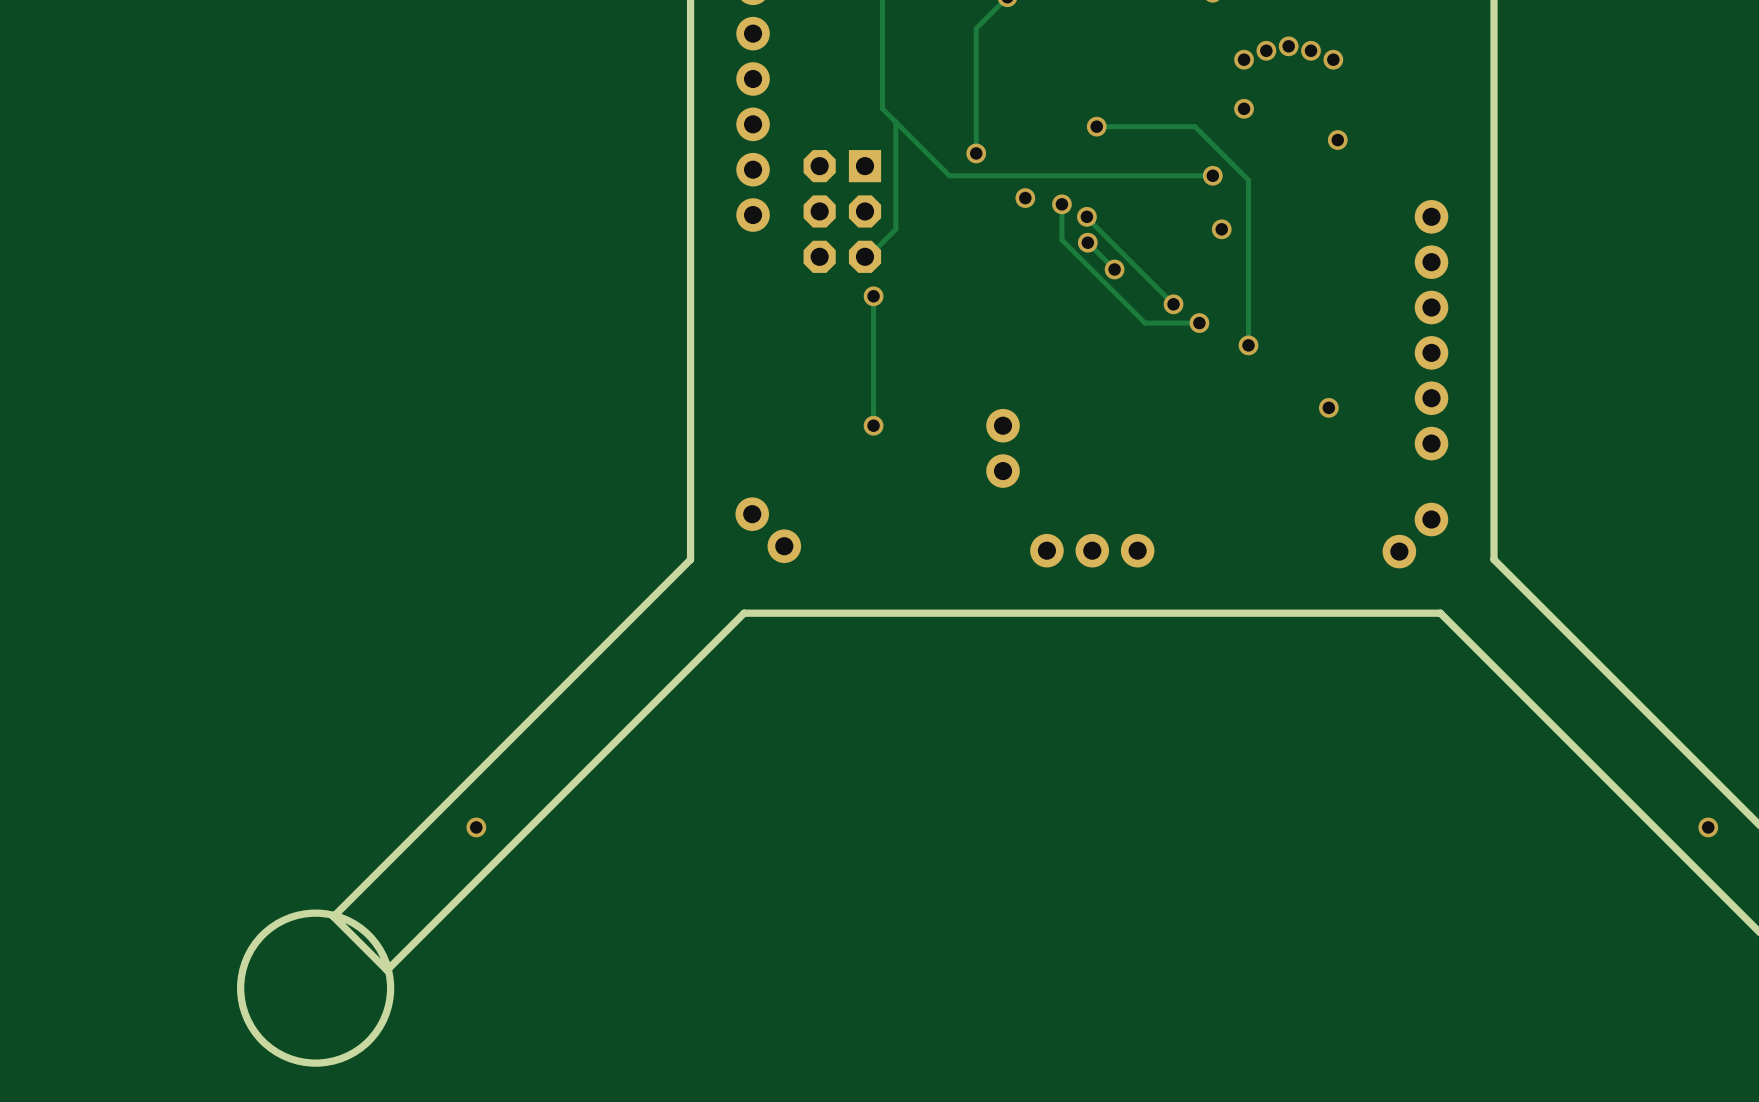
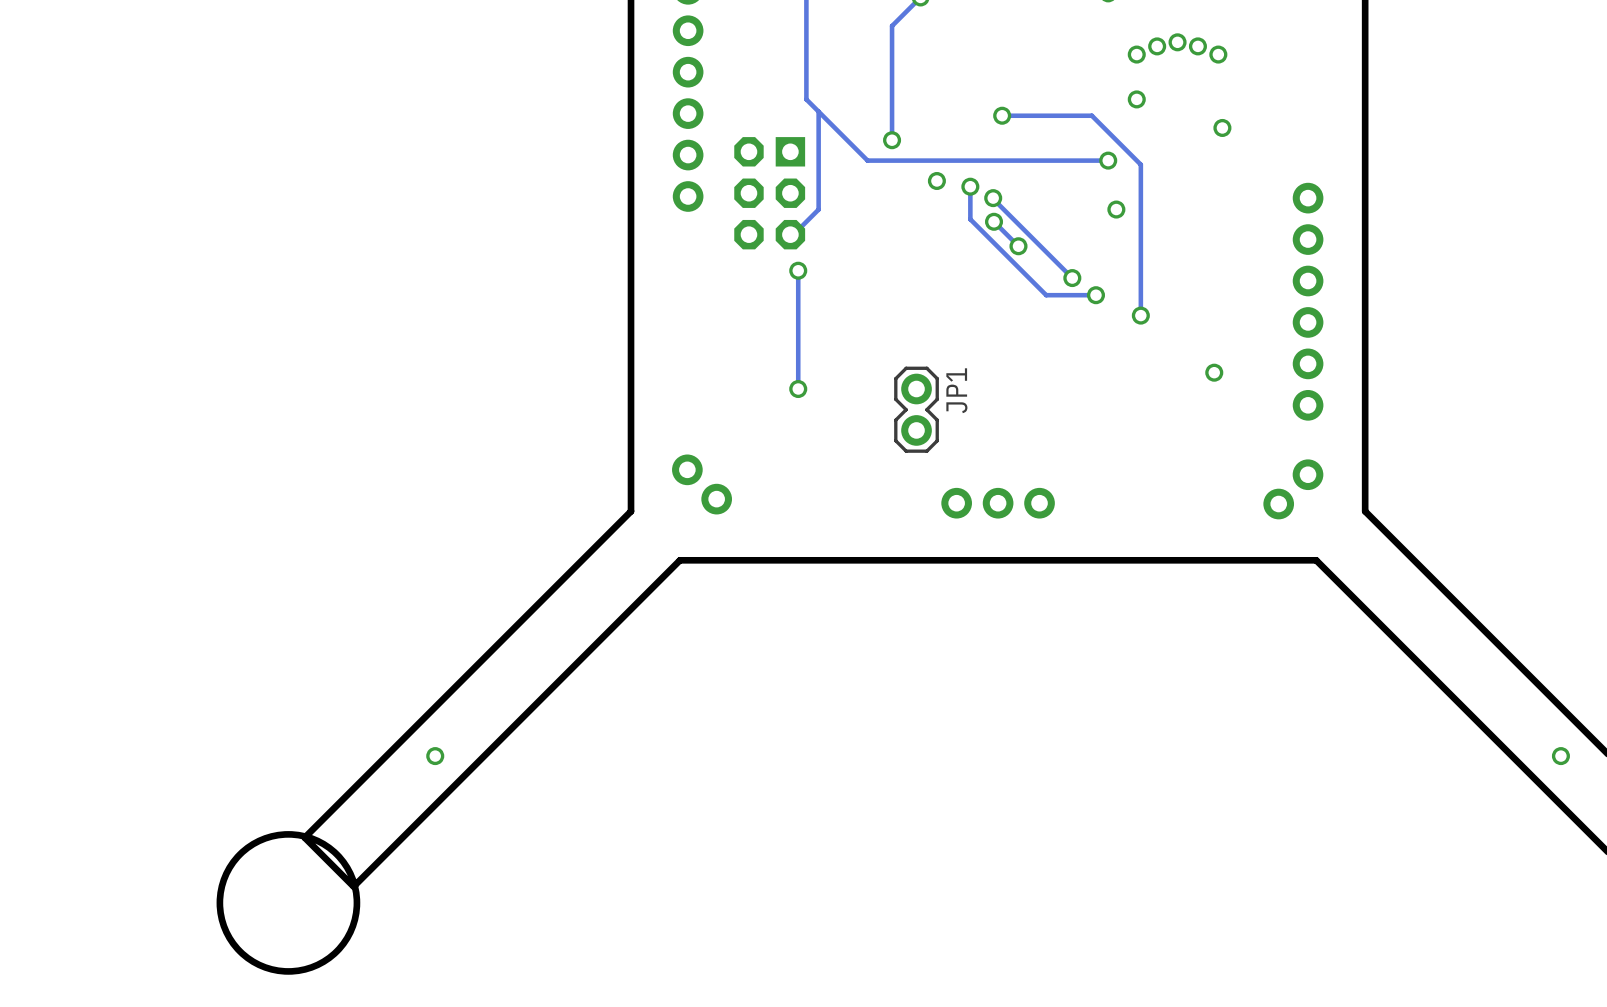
JP1 side: top (1003, 448) -> bottom (916, 409)

